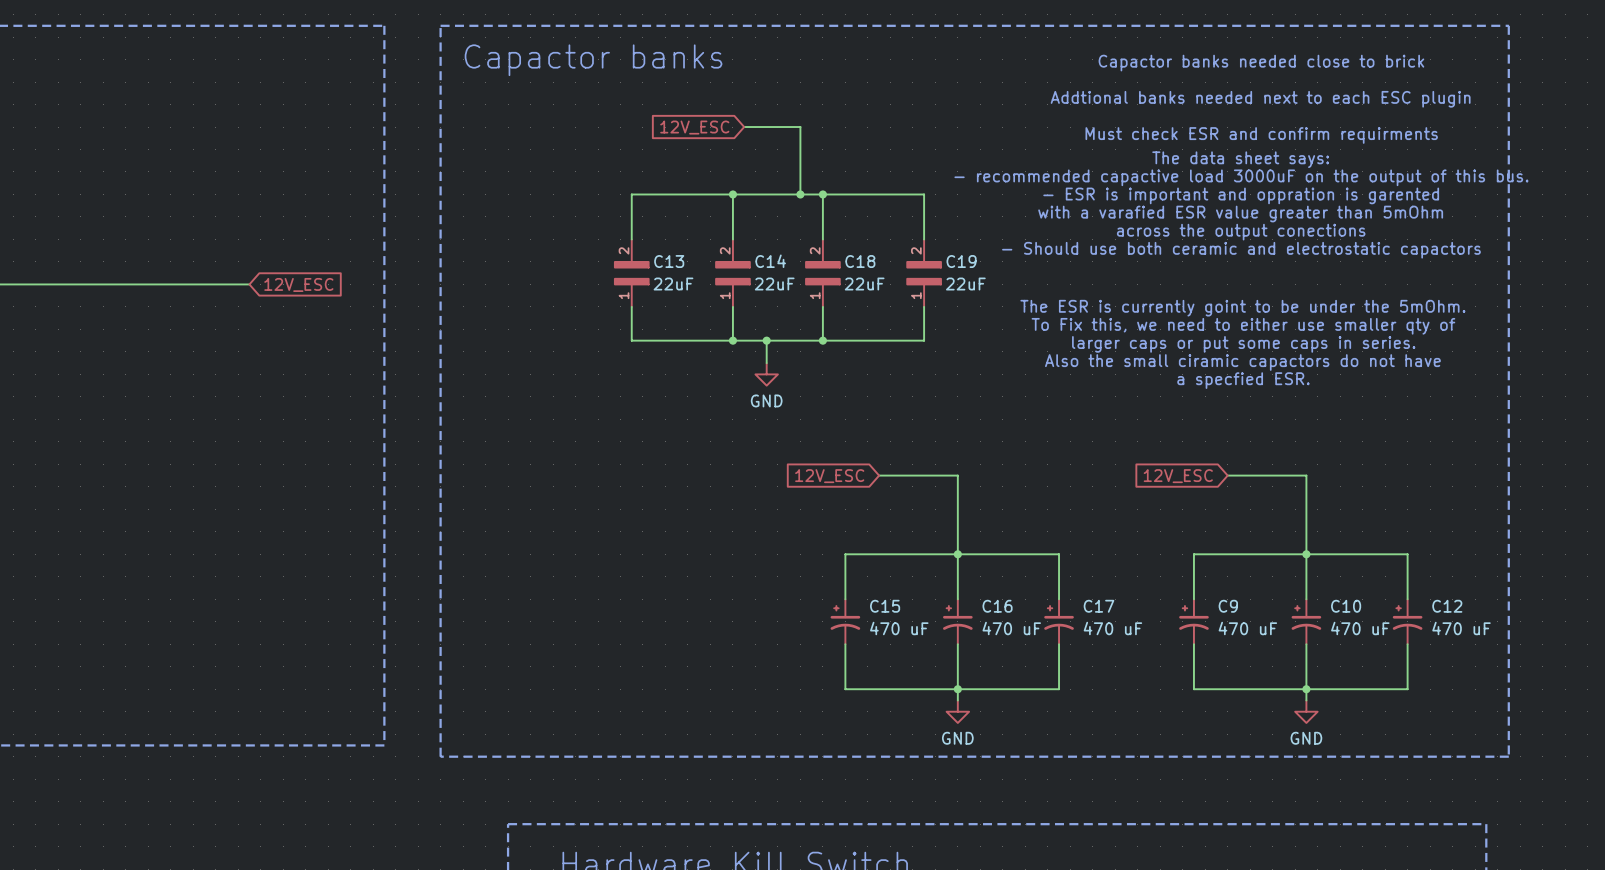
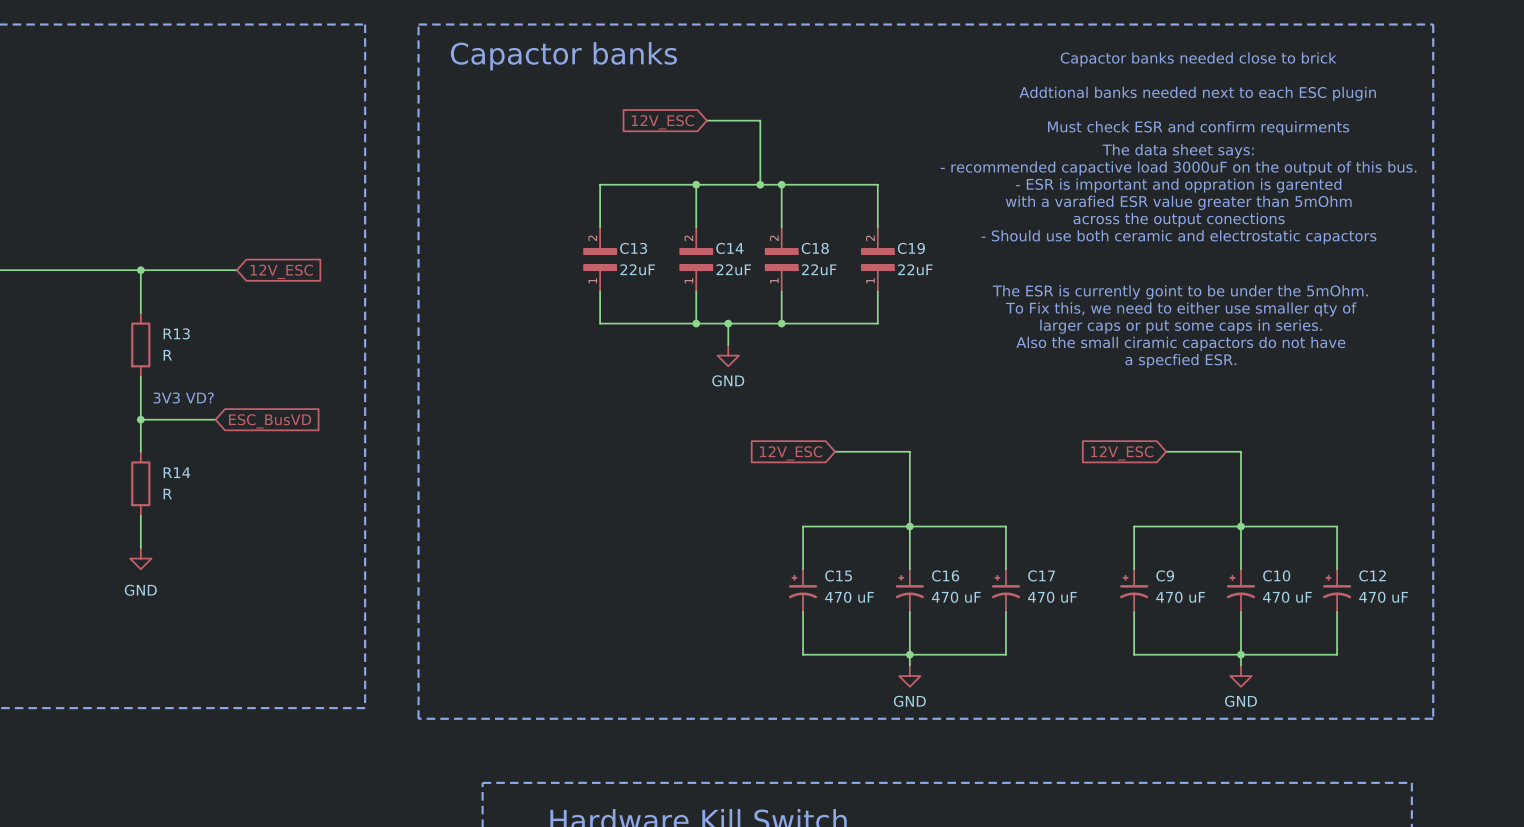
wire: none -> (140, 270) (140, 312)
junction: none -> (140, 270)
R13: none -> R (140, 344)
wire: none -> (140, 376) (140, 451)
text: none -> 3V3 VD? (183, 398)
wire: none -> (140, 419) (215, 419)
junction: none -> (140, 419)
global label: none -> ESC_BusVD (270, 421)
R14: none -> R (140, 483)
wire: none -> (140, 515) (140, 547)
power symbol: none -> GND (140, 558)

